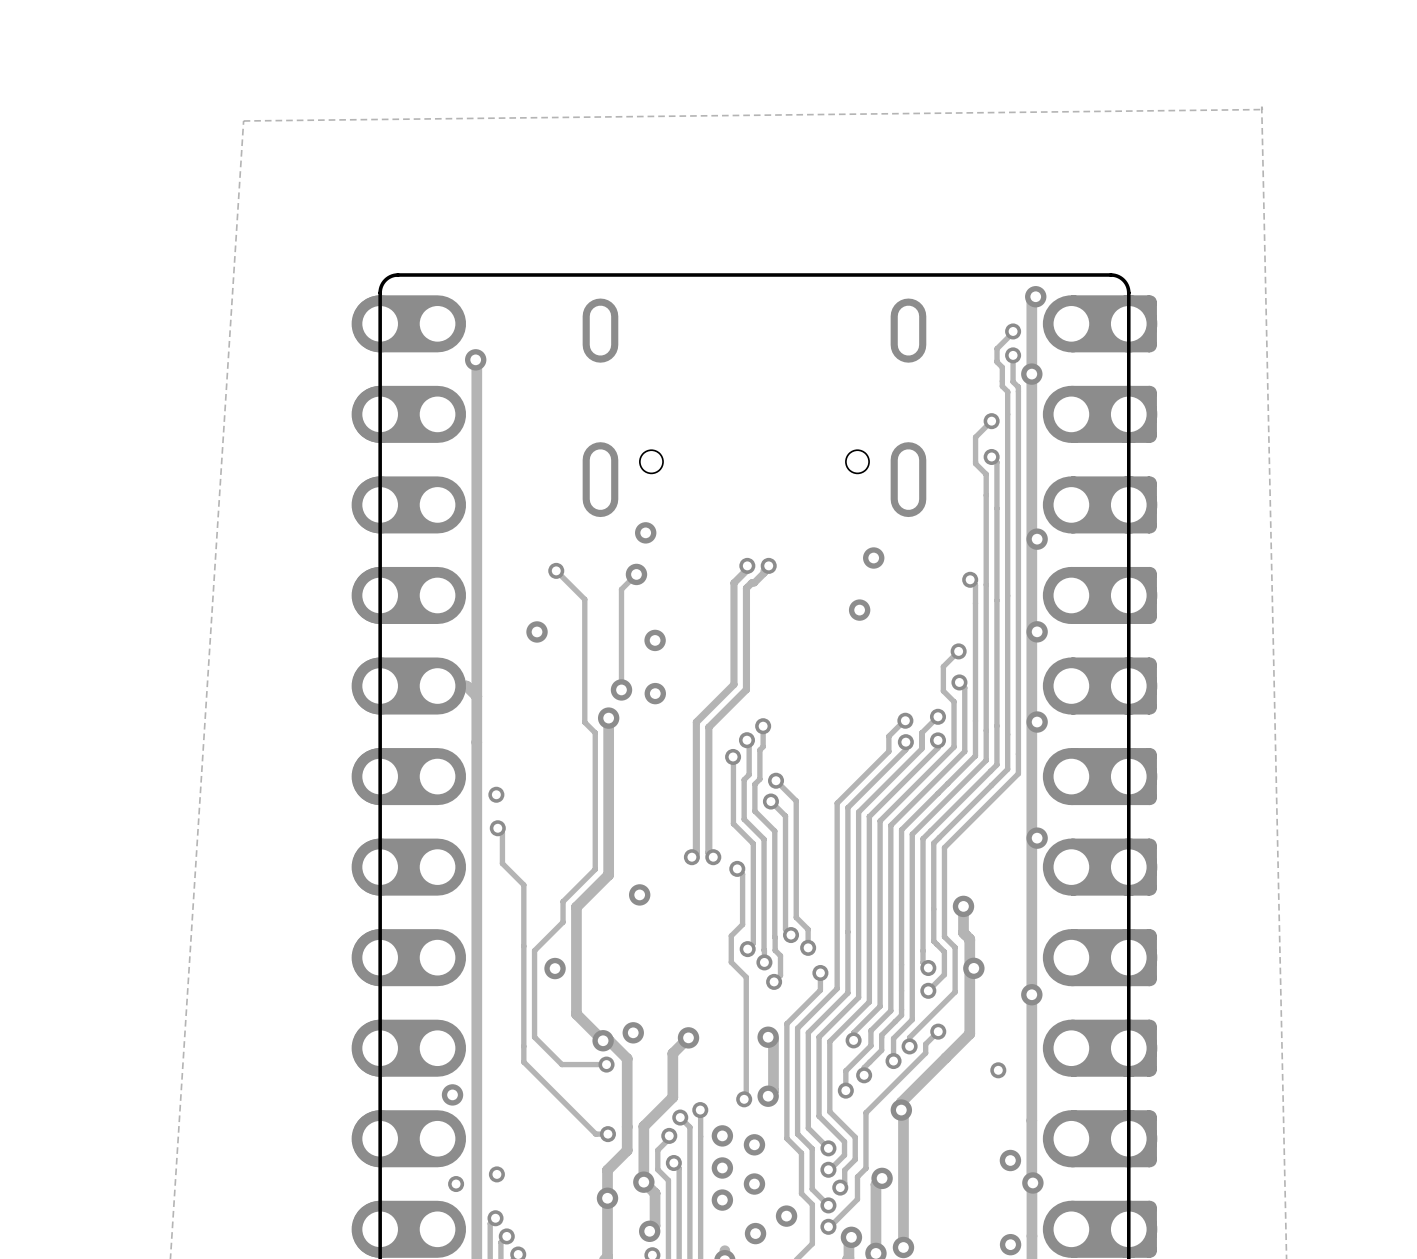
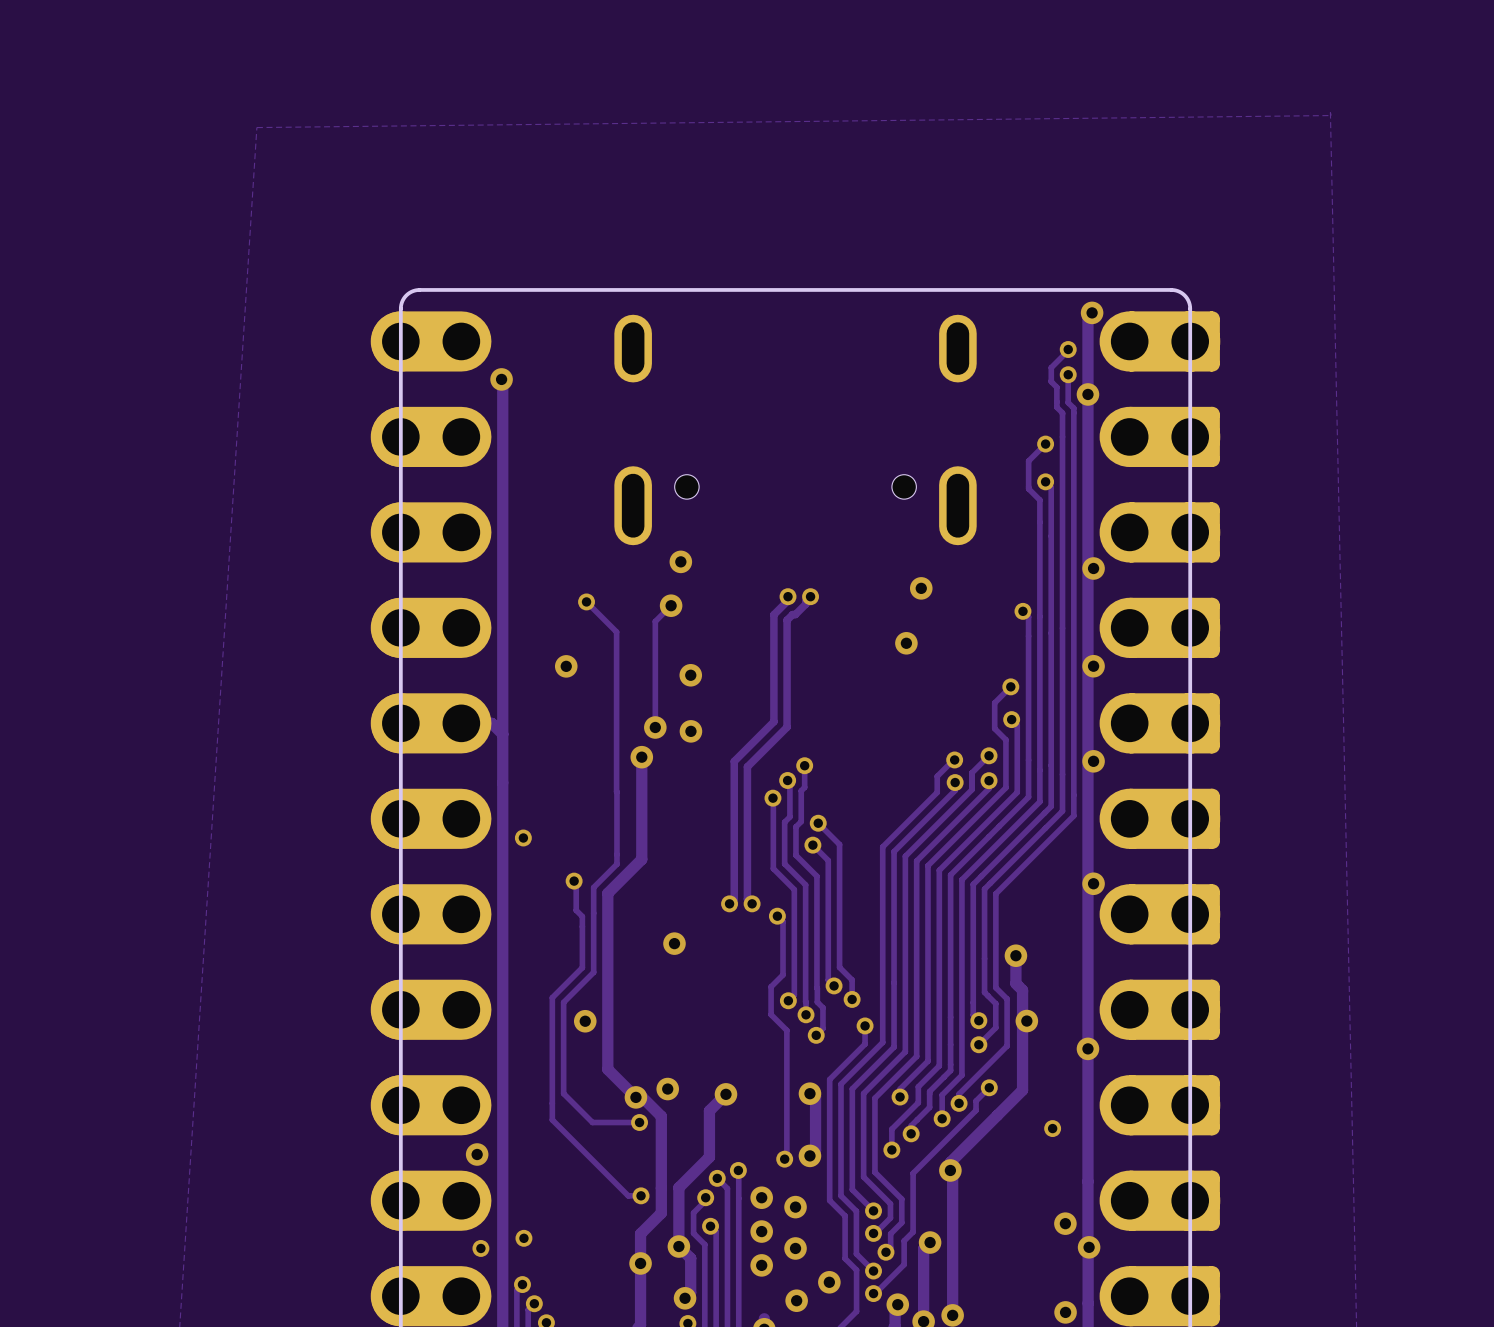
track: (584, 722) (595, 732) (595, 869) (563, 901) -> (616, 792) (616, 864) (593, 887) (593, 950)
track: none -> (616, 761) (616, 791)
track: (608, 815) (608, 874) (576, 907) -> (641, 859) (607, 893) (607, 956)
track: (497, 828) (502, 832) (502, 863) (523, 884) (523, 946) -> (574, 881) (576, 883) (576, 910) (582, 916) (582, 967) (552, 997)
via position: (497, 828) -> (574, 881)

